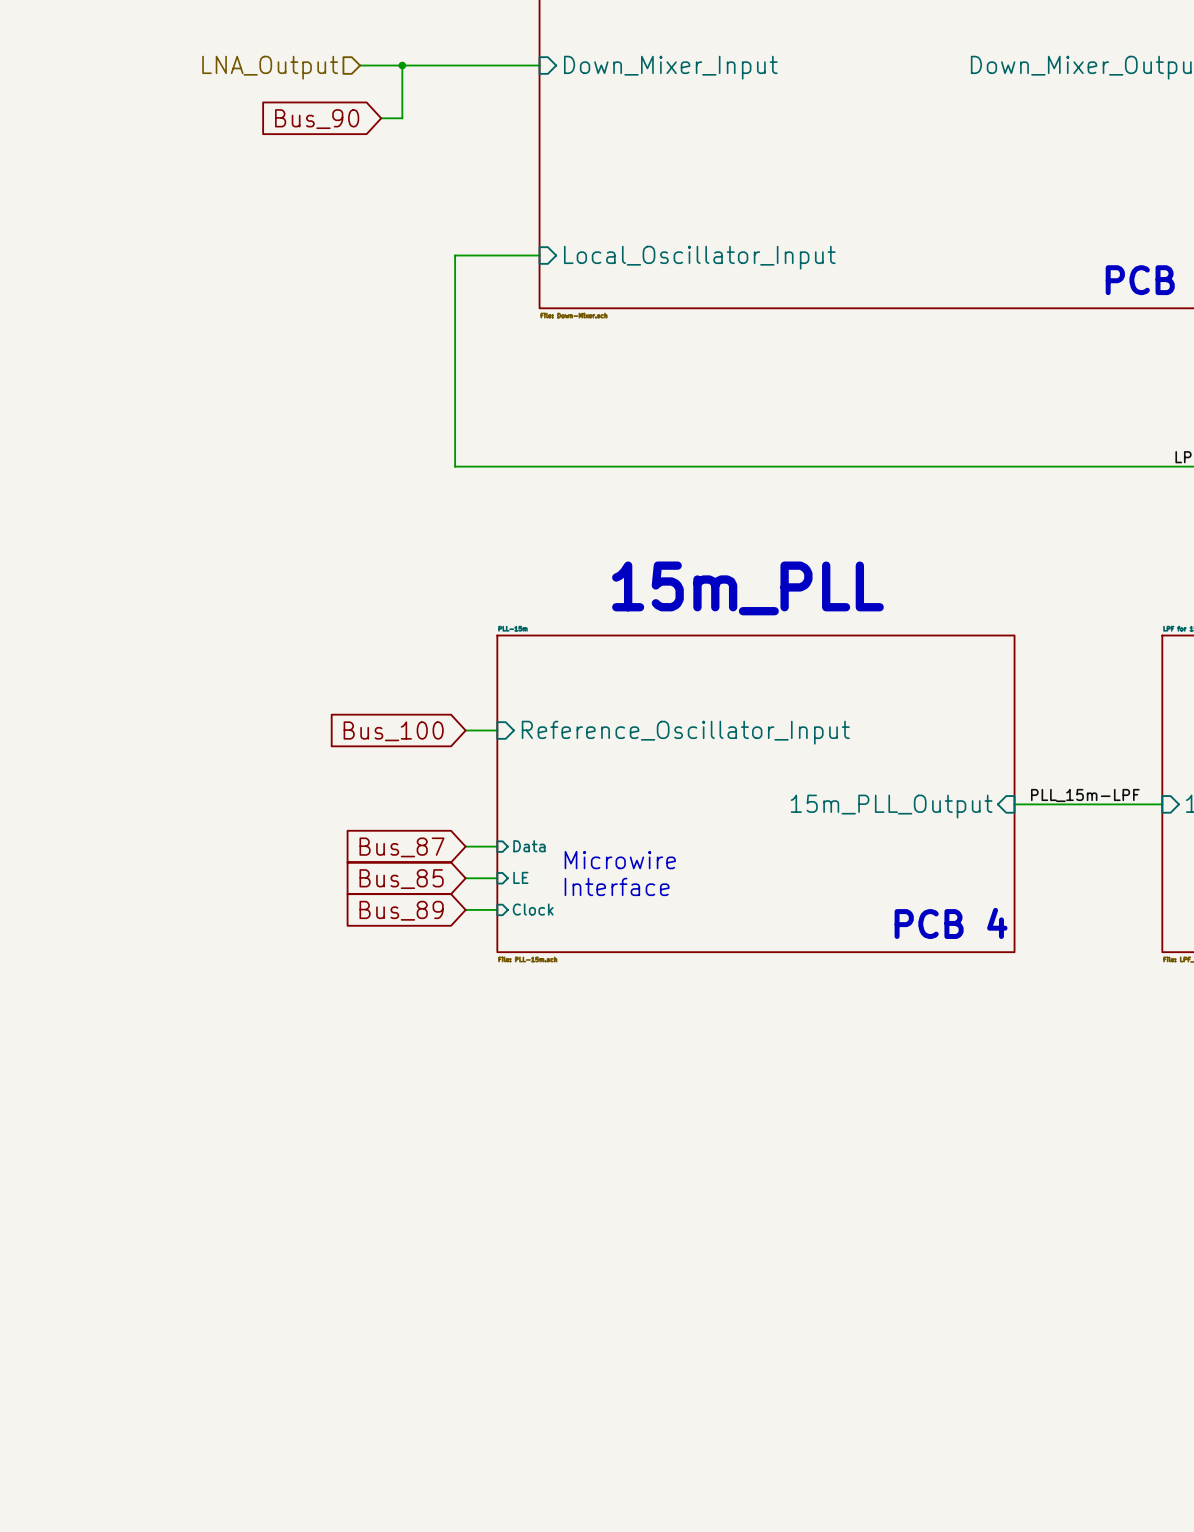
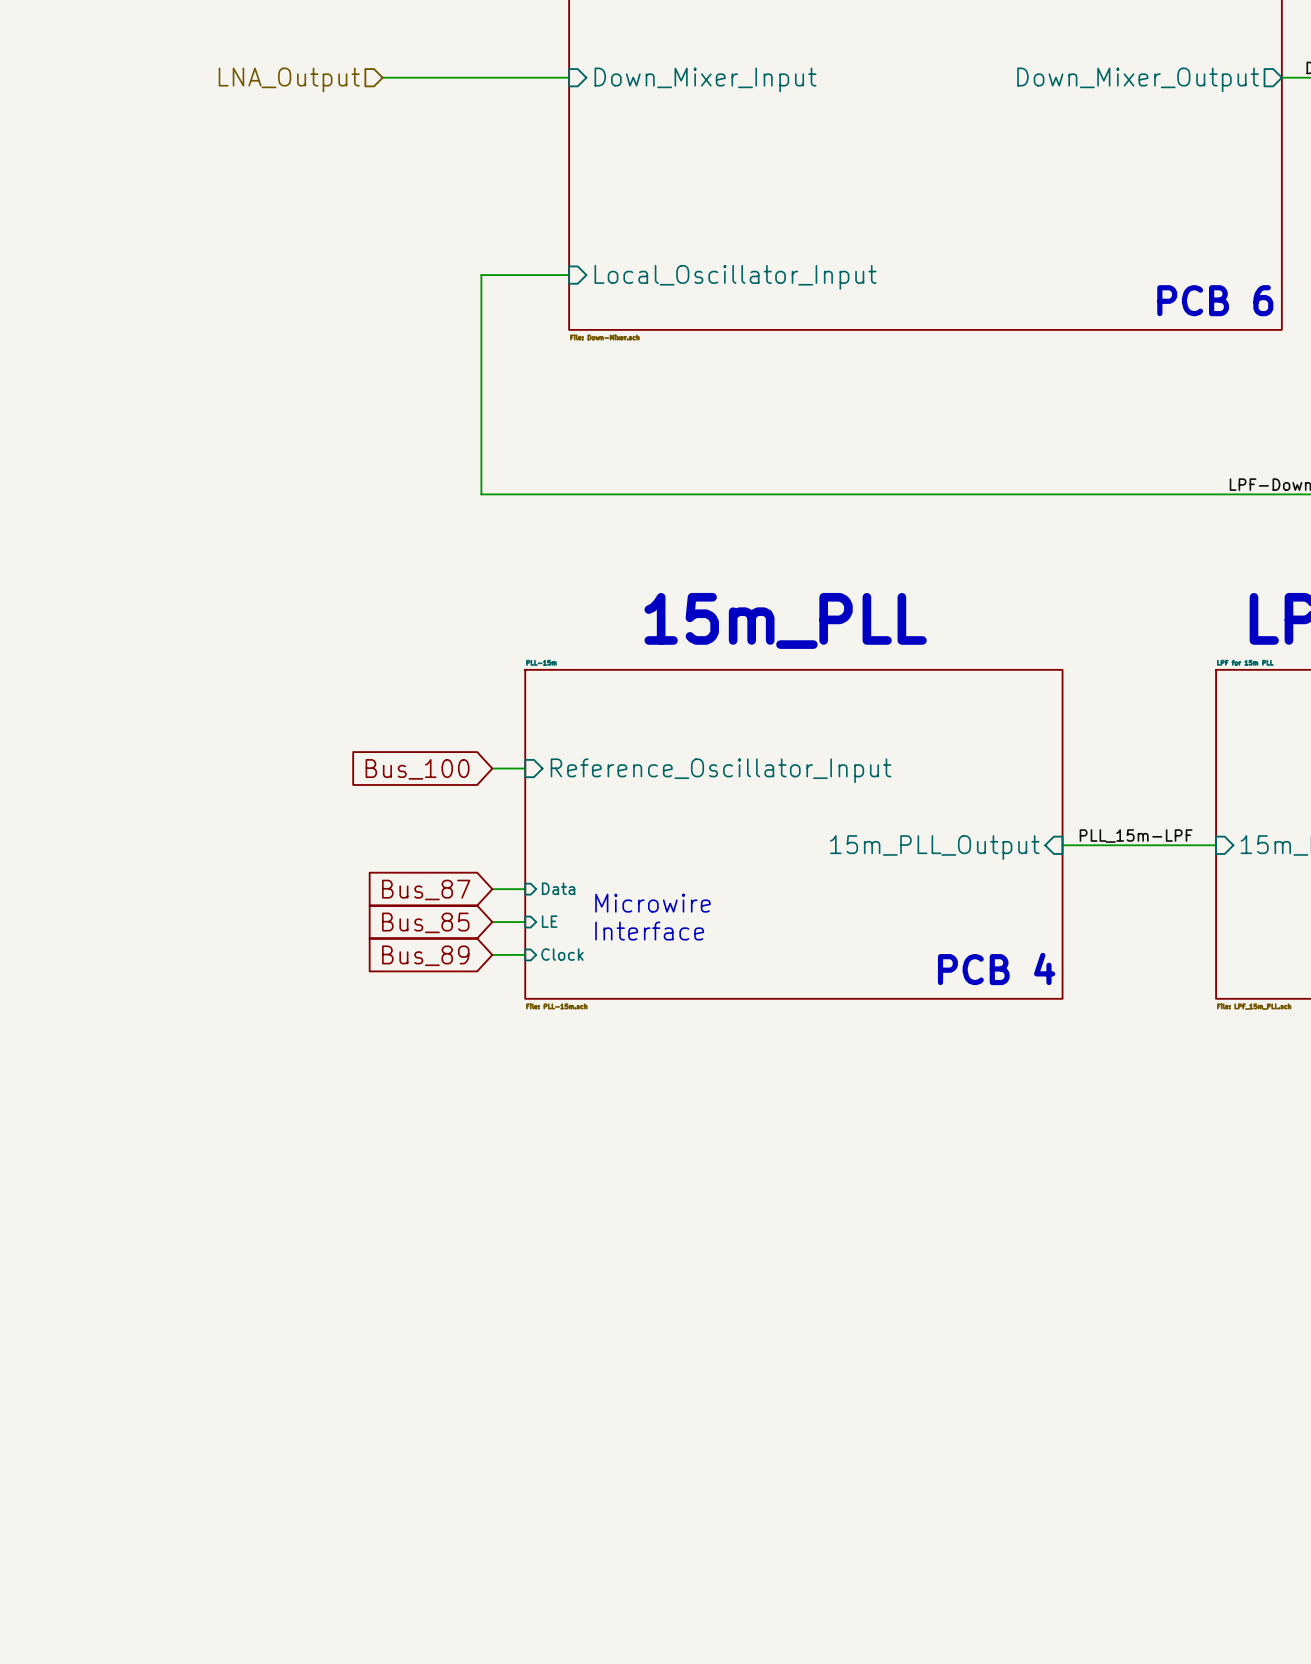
wire: (402, 65) (402, 118) (381, 118) -> none
junction: (402, 65) -> none
global label: Bus_90 (317, 119) -> none

